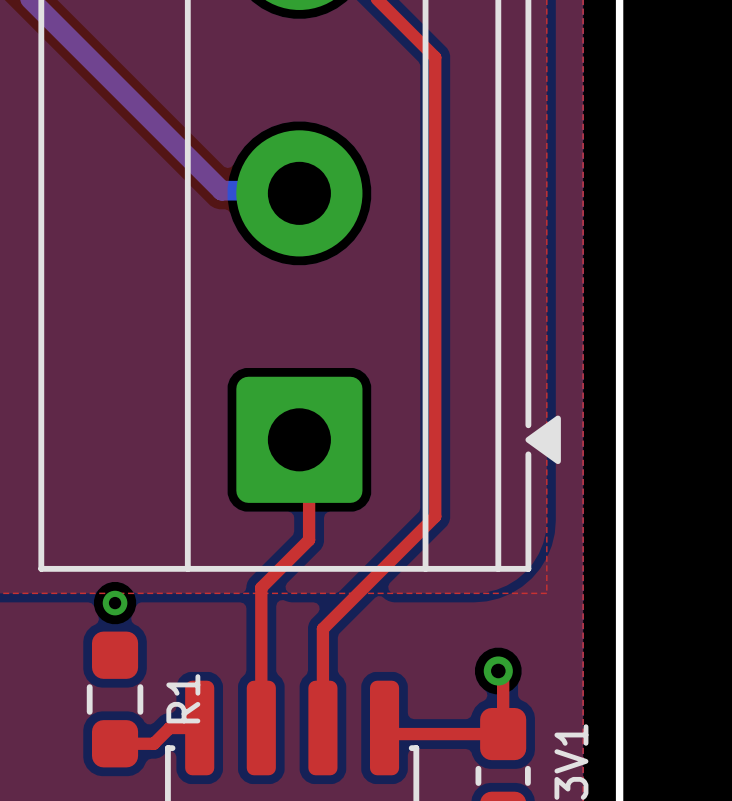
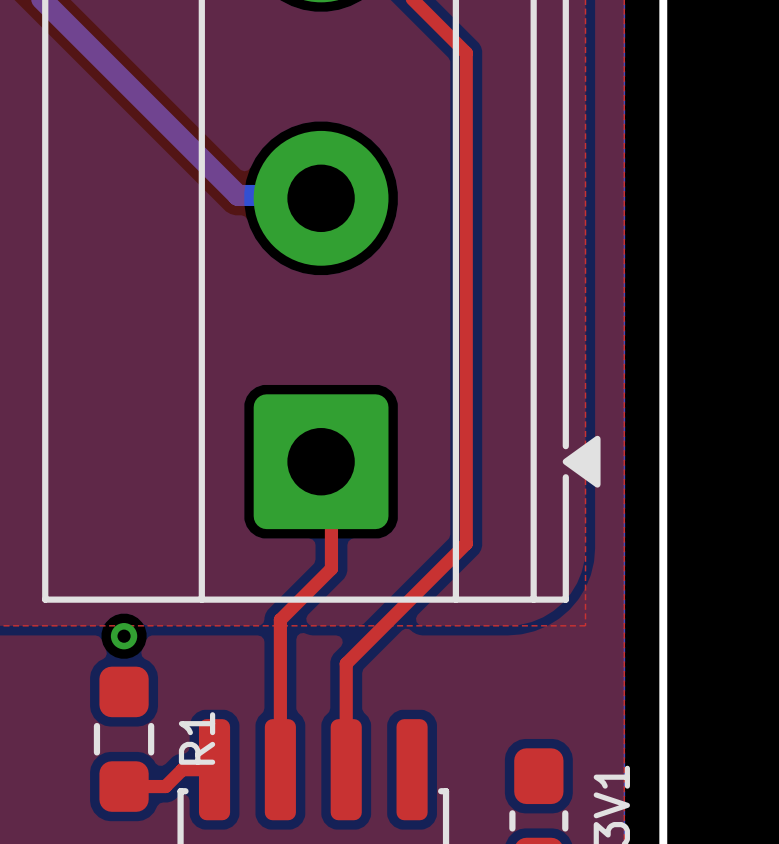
top track: (498, 670) (503, 675) (503, 734) (390, 734) (384, 727) -> none
via: (498, 670) -> none

